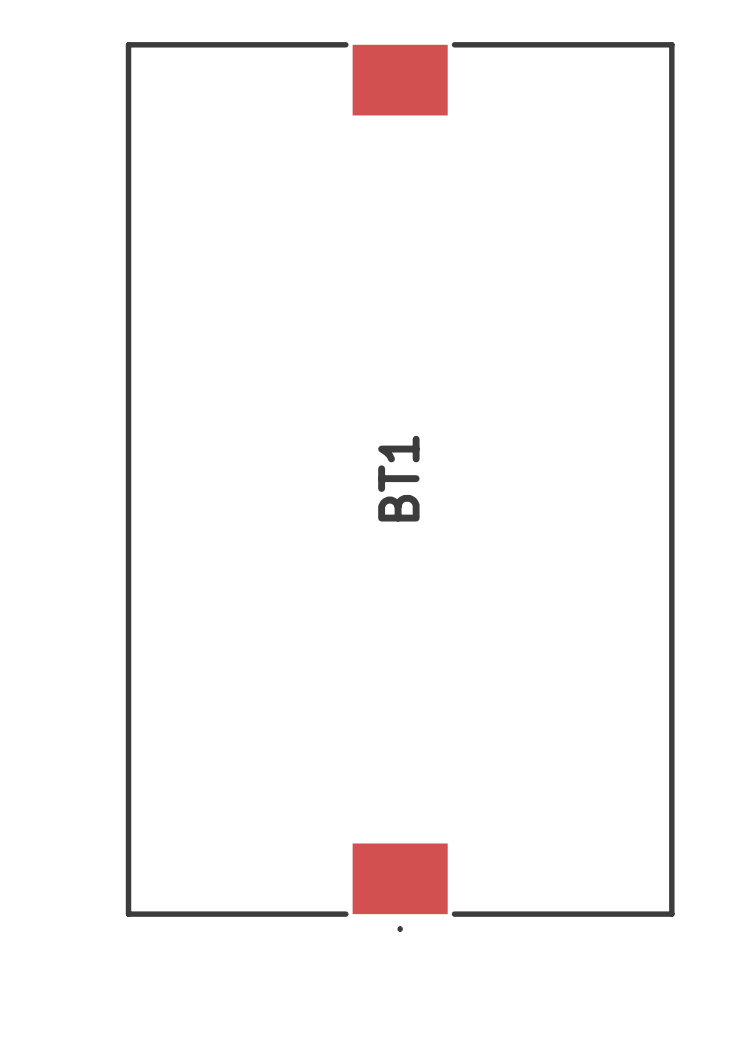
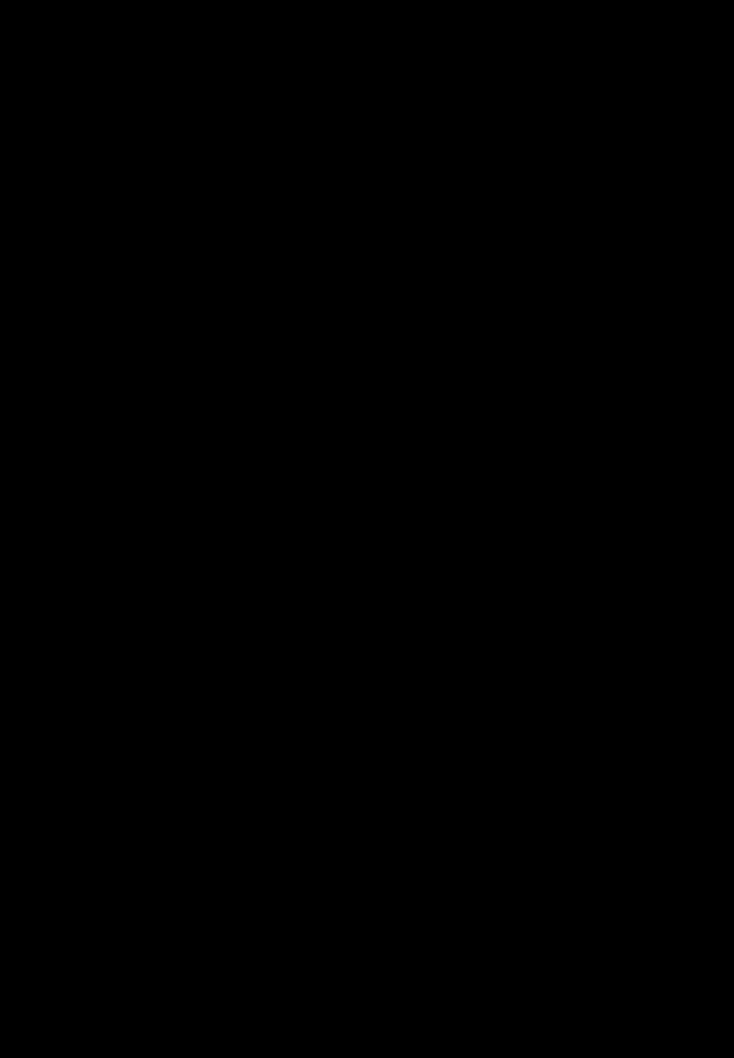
BT1: (400, 486) -> none

